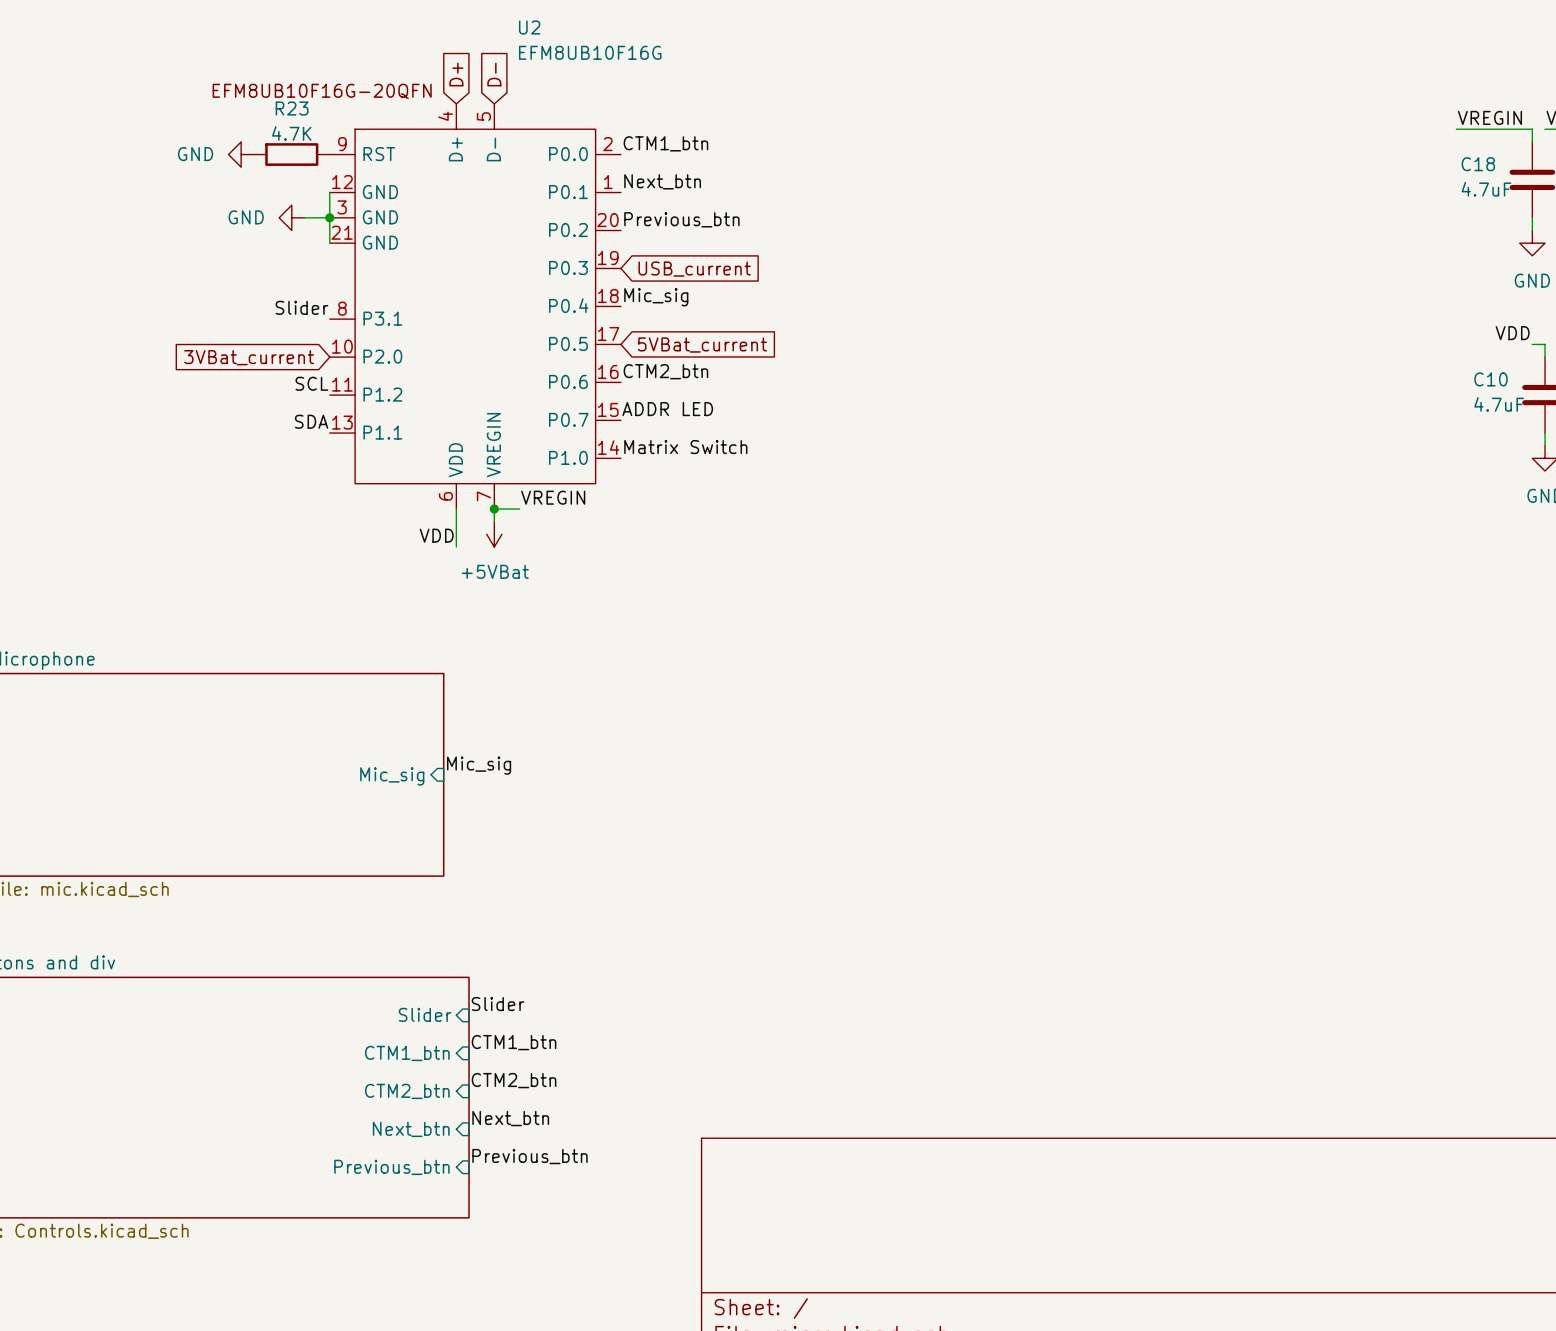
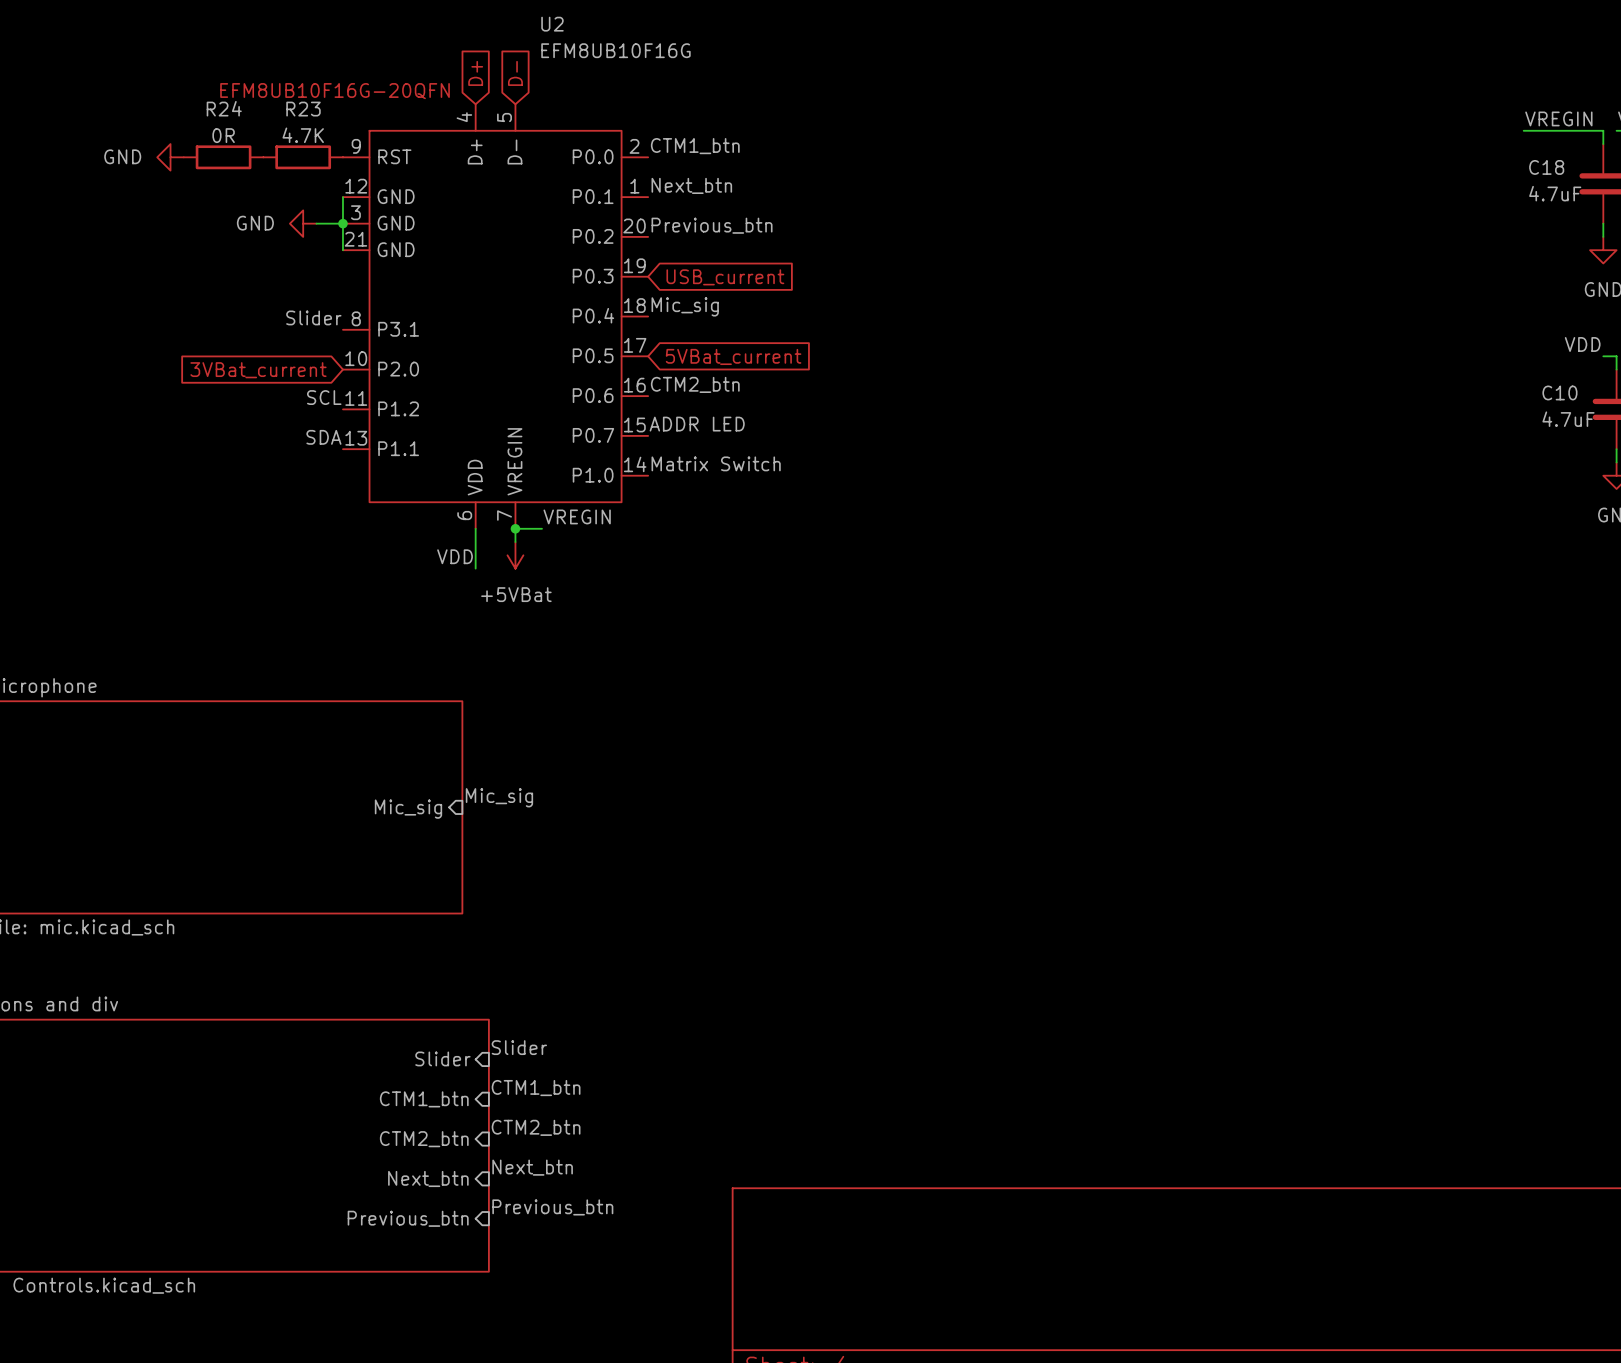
R24: none -> 0R (223, 157)
power symbol position: GND (241, 154) -> GND (170, 157)

